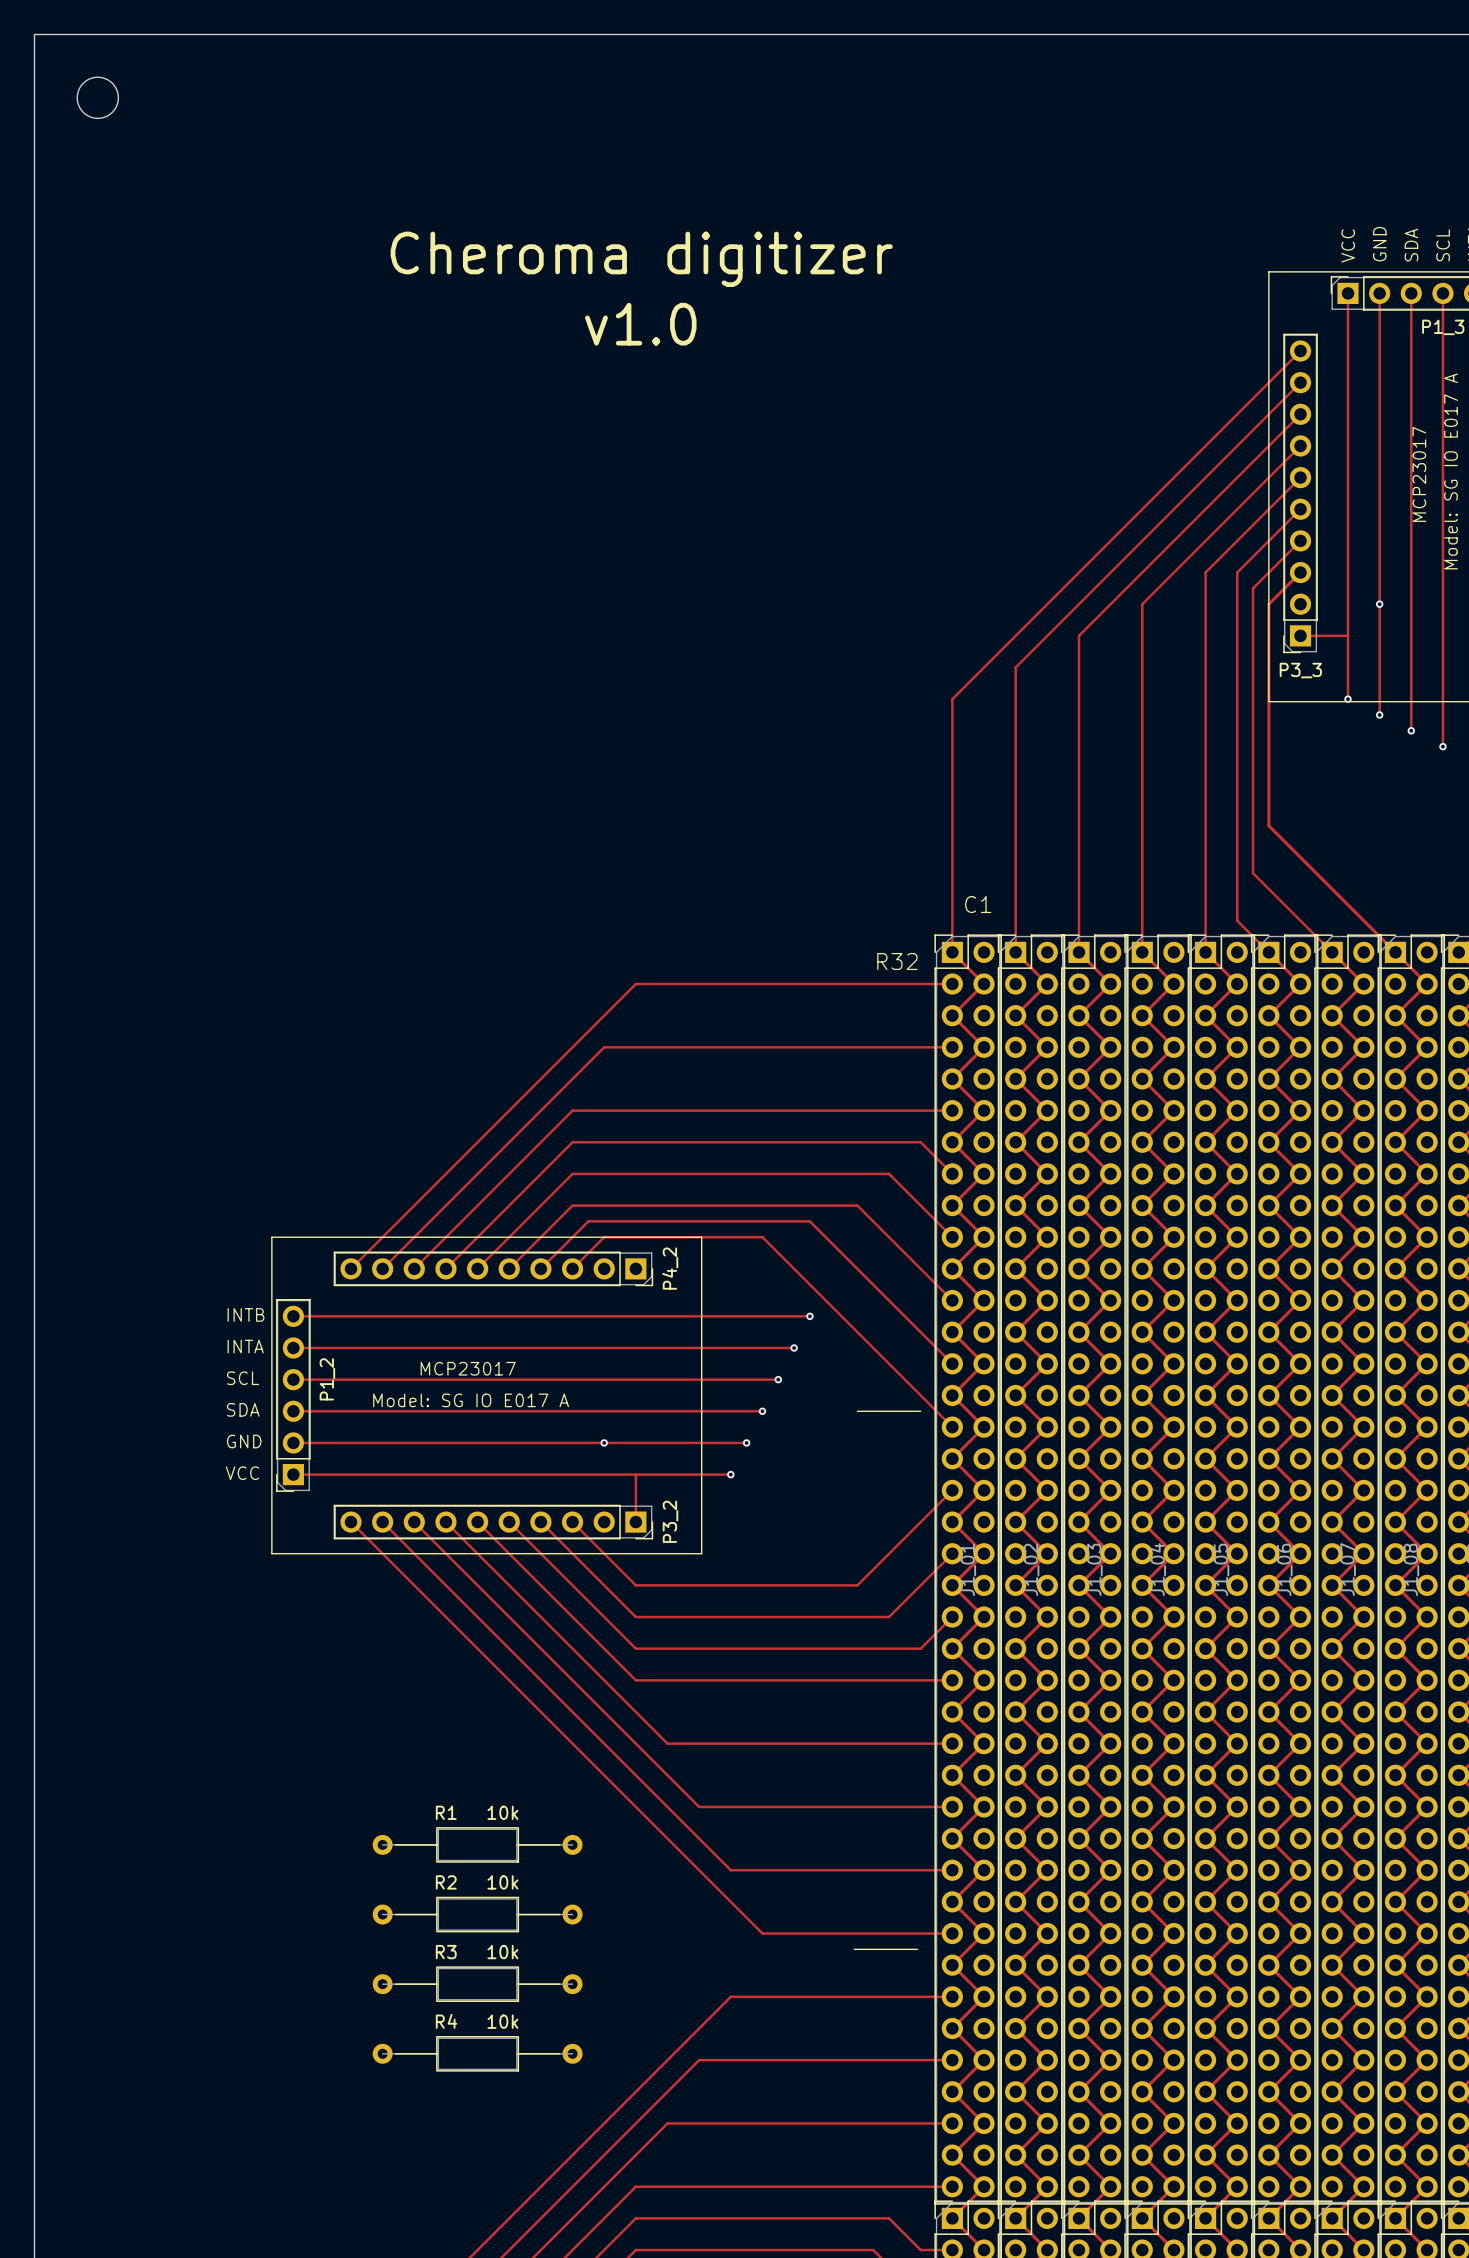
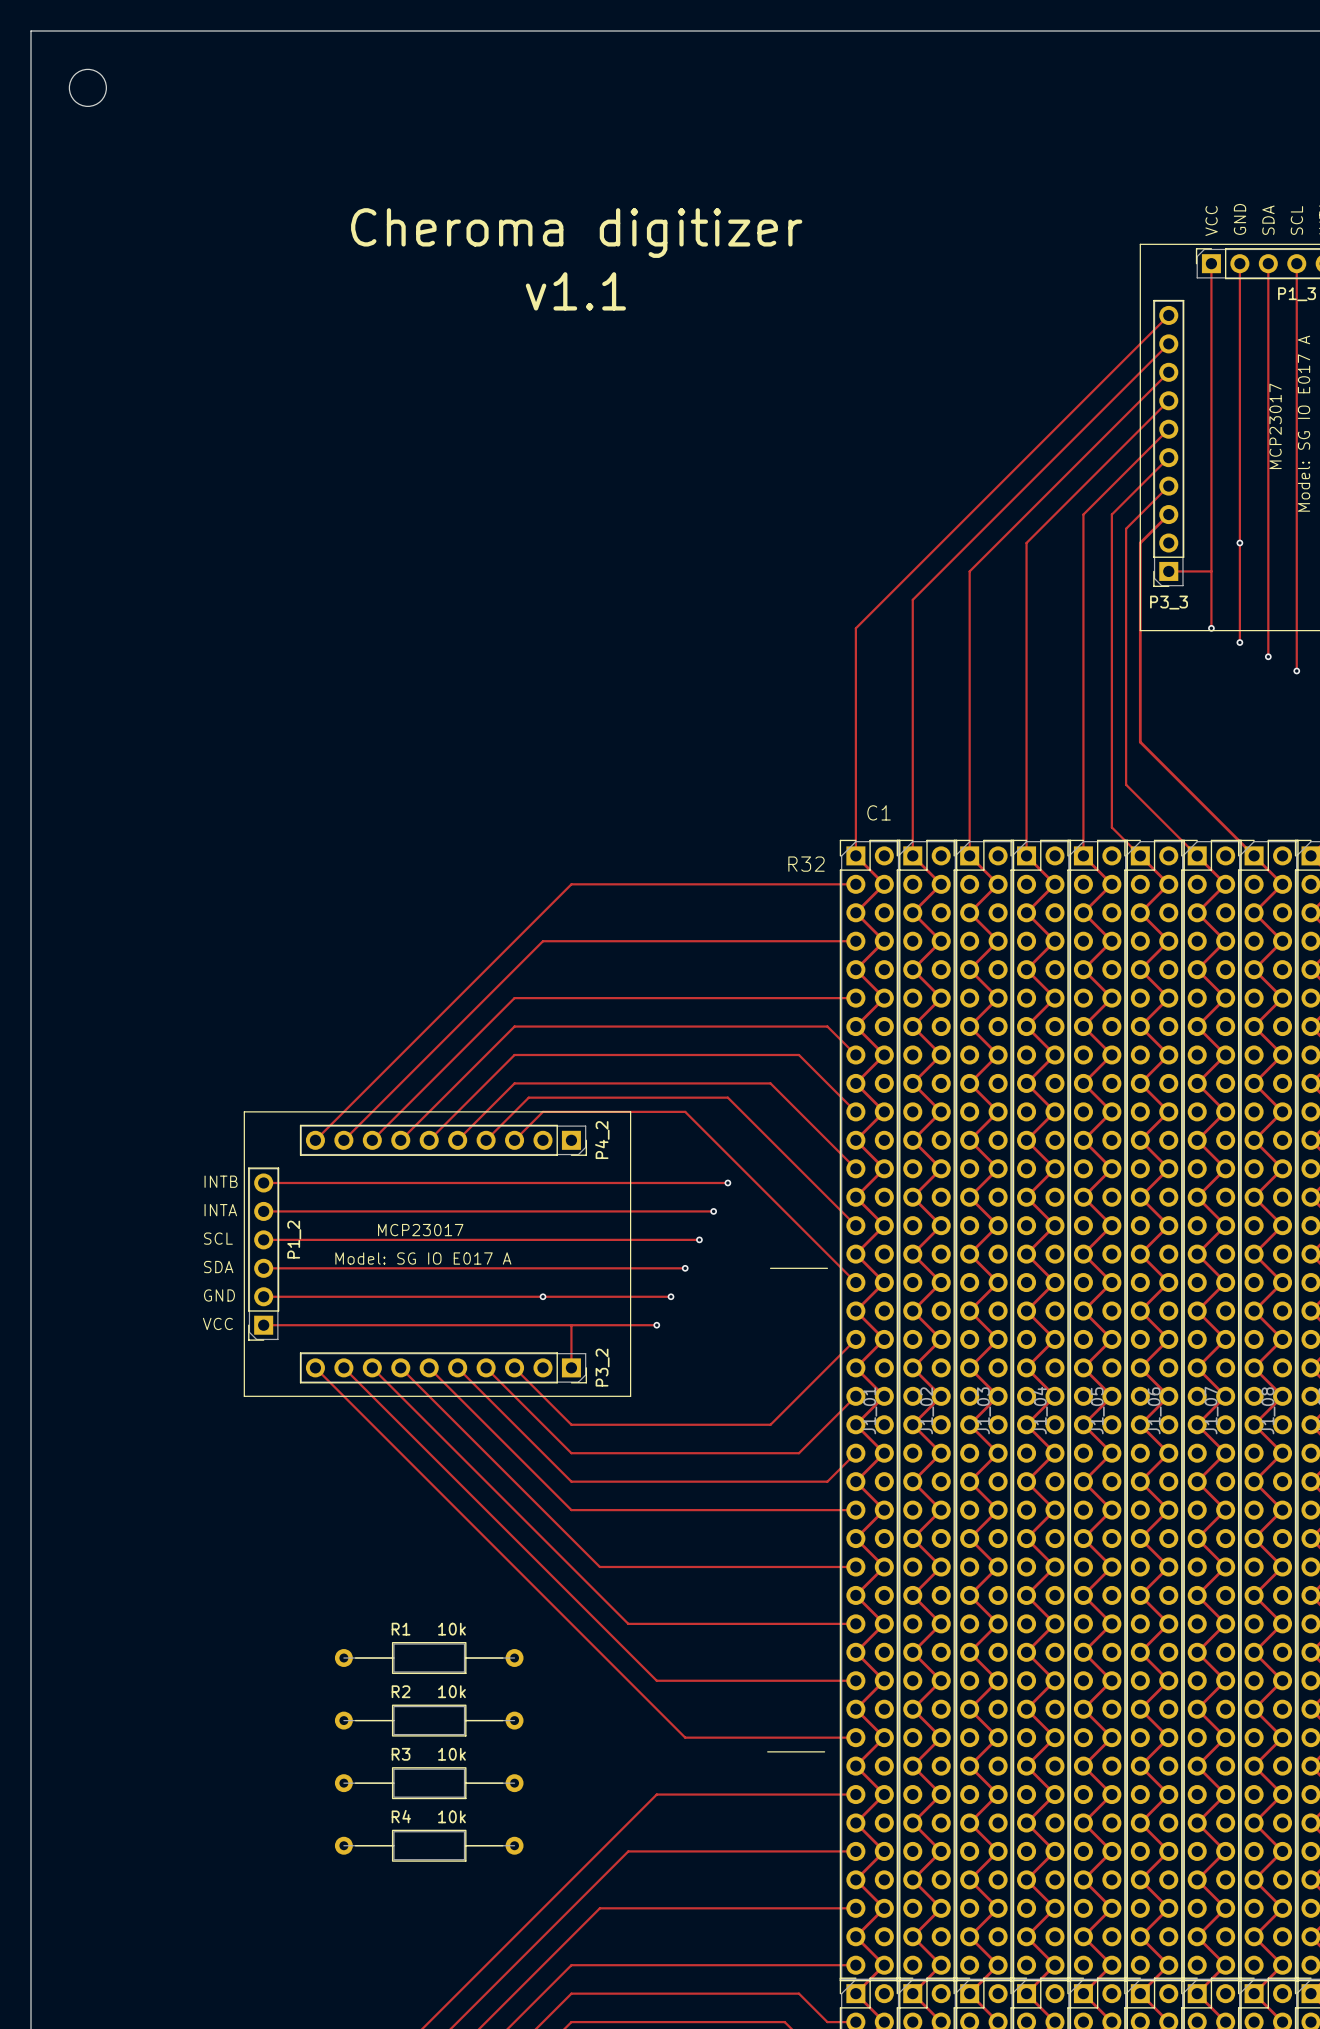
text: v1.0 (640, 324) -> v1.1 (575, 291)

